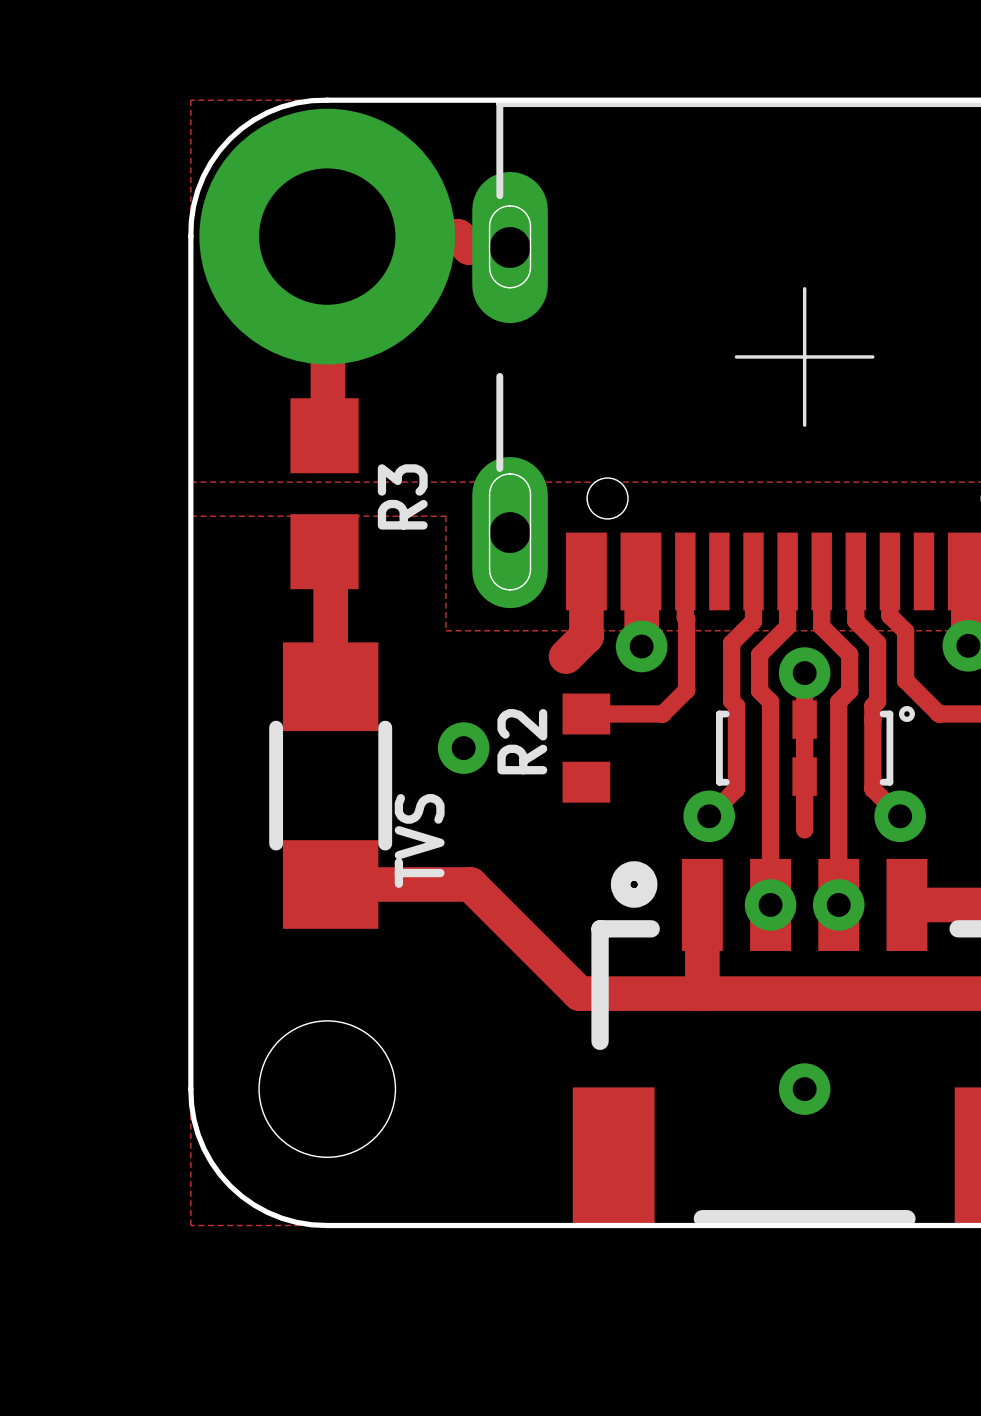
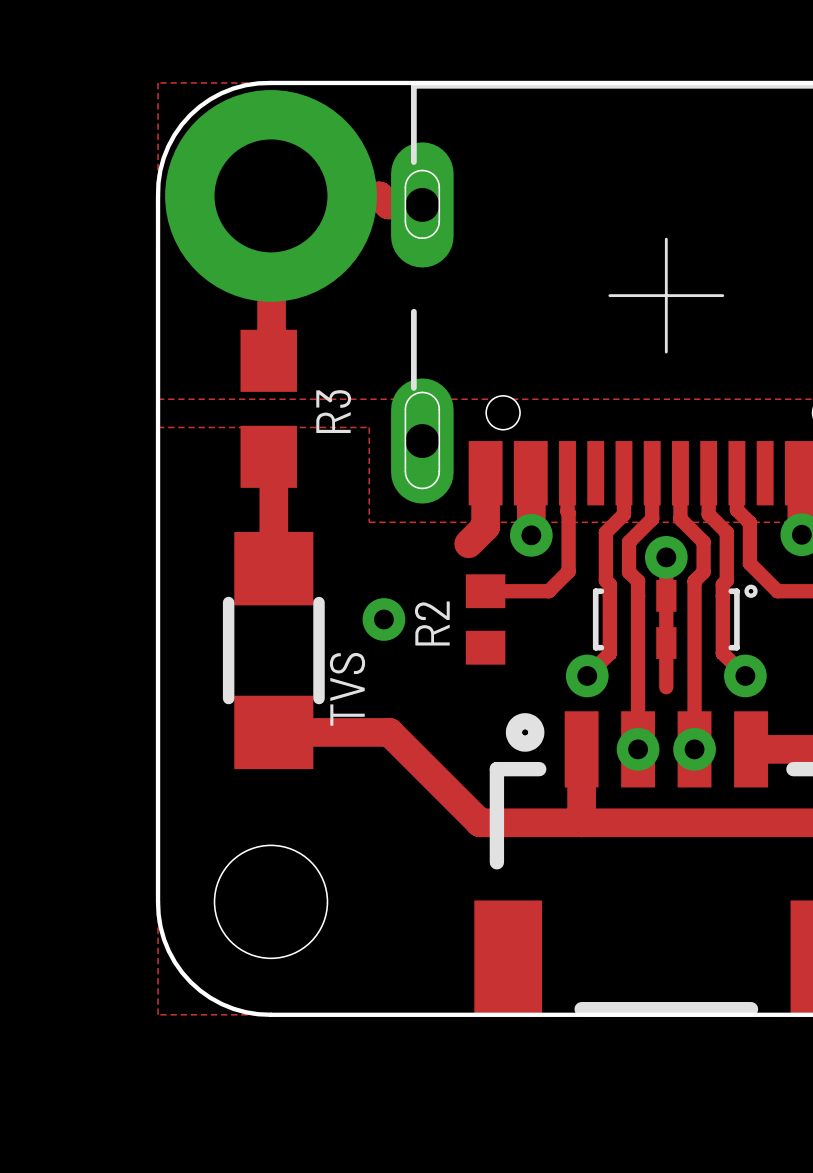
via: (804, 1089) -> none

